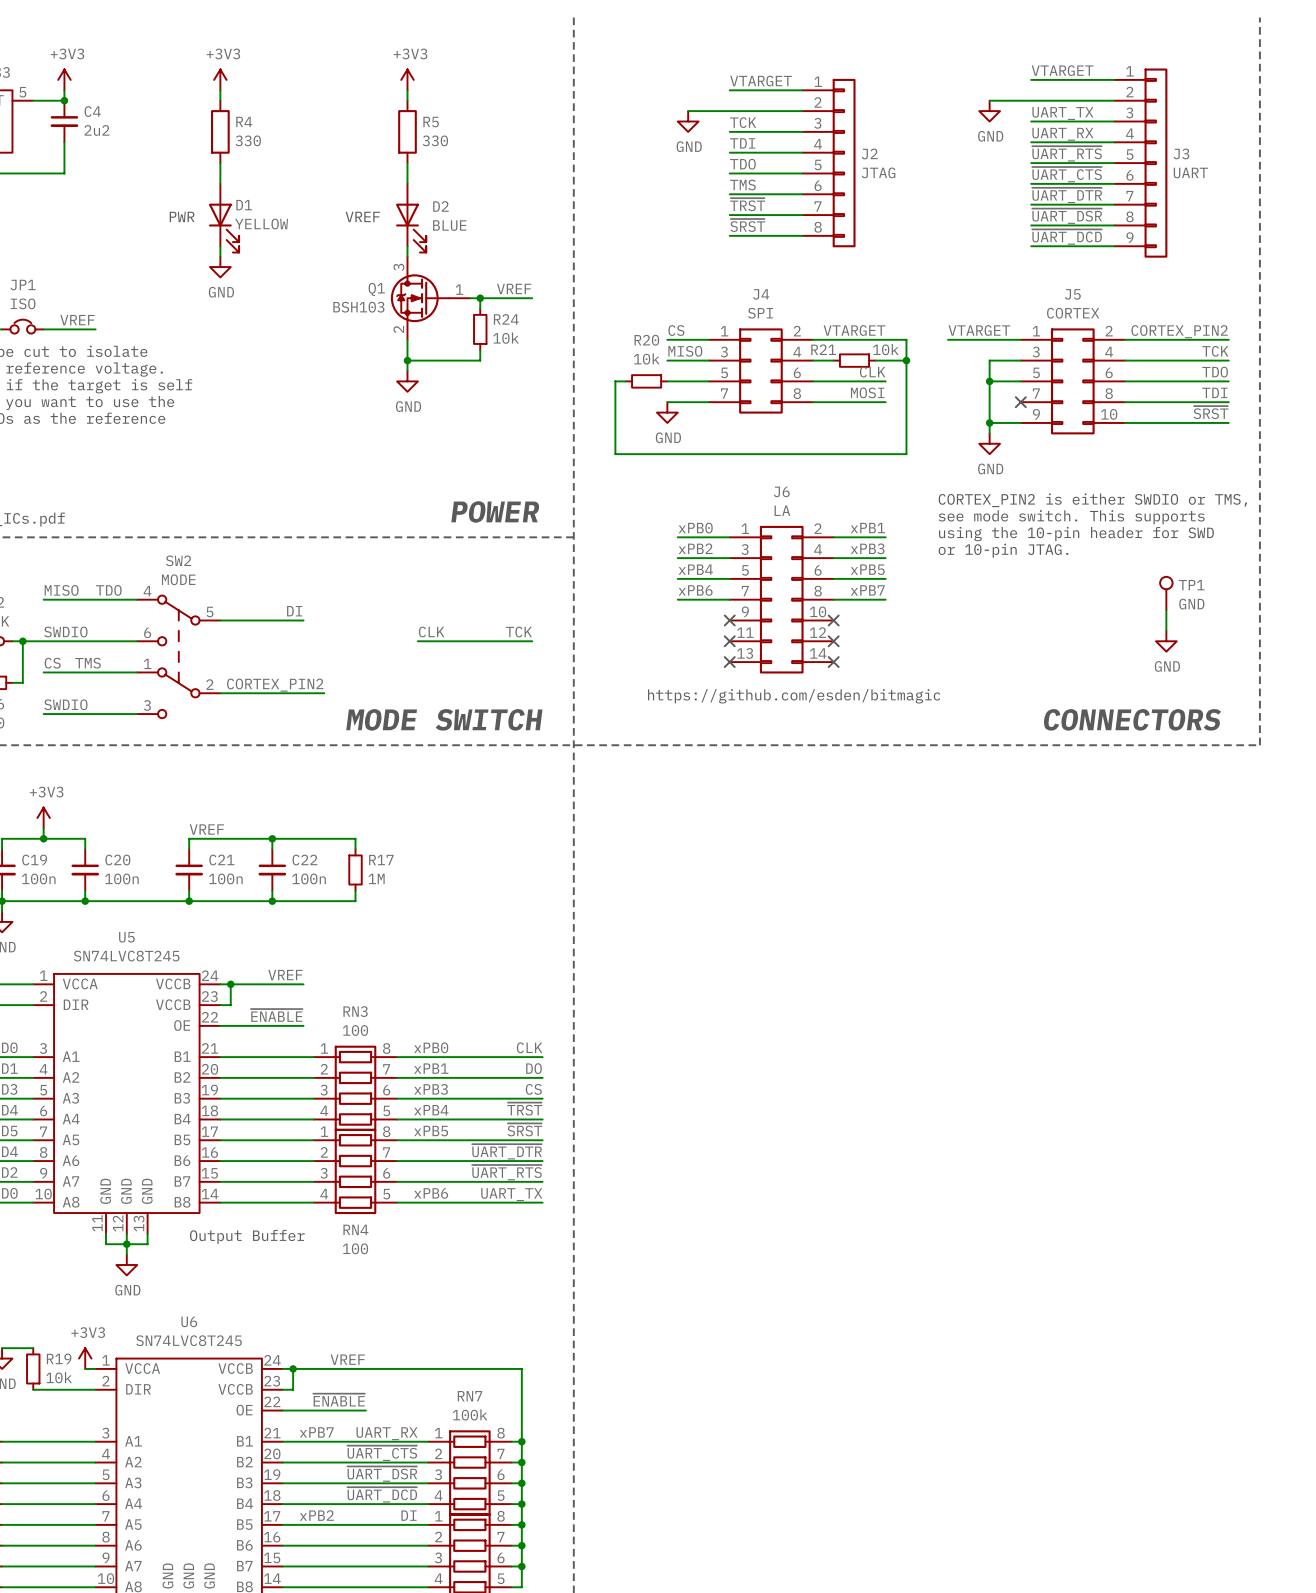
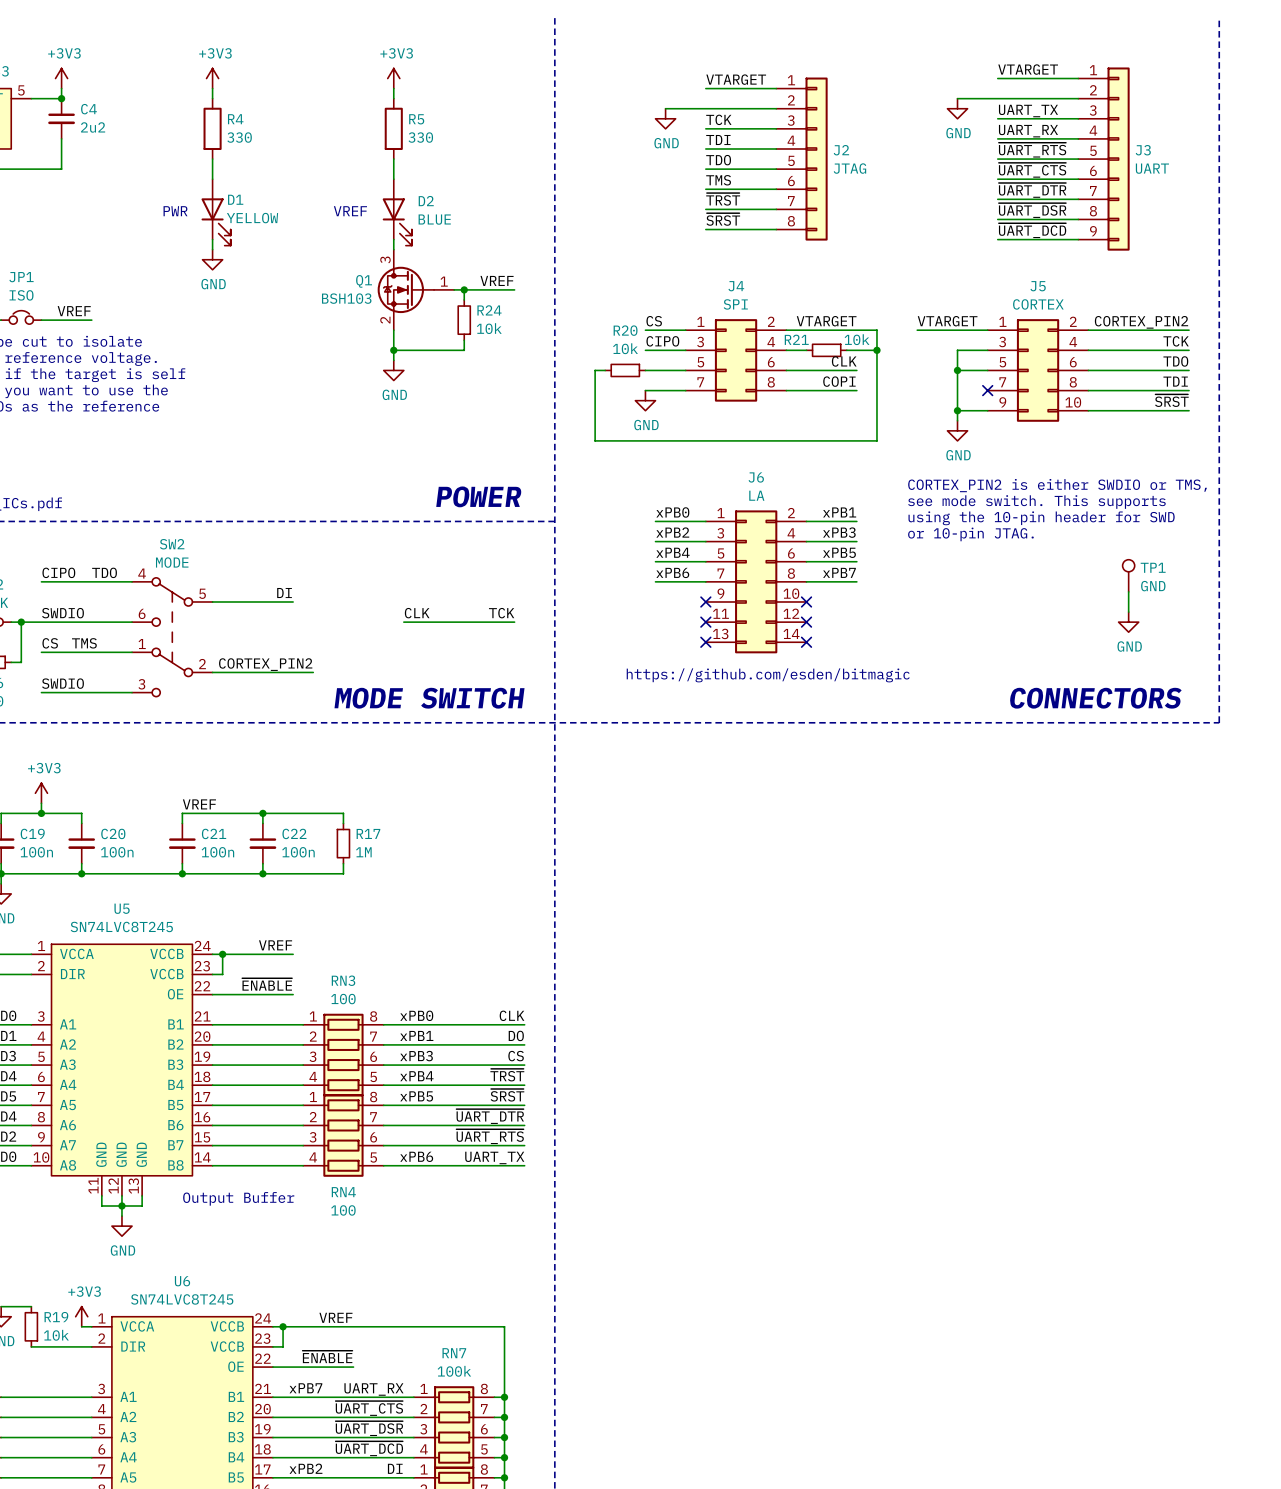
label: MISO (685, 351) -> CIPO (662, 341)
label: MOSI (867, 392) -> COPI (839, 381)
label: MISO (61, 590) -> CIPO (58, 572)

